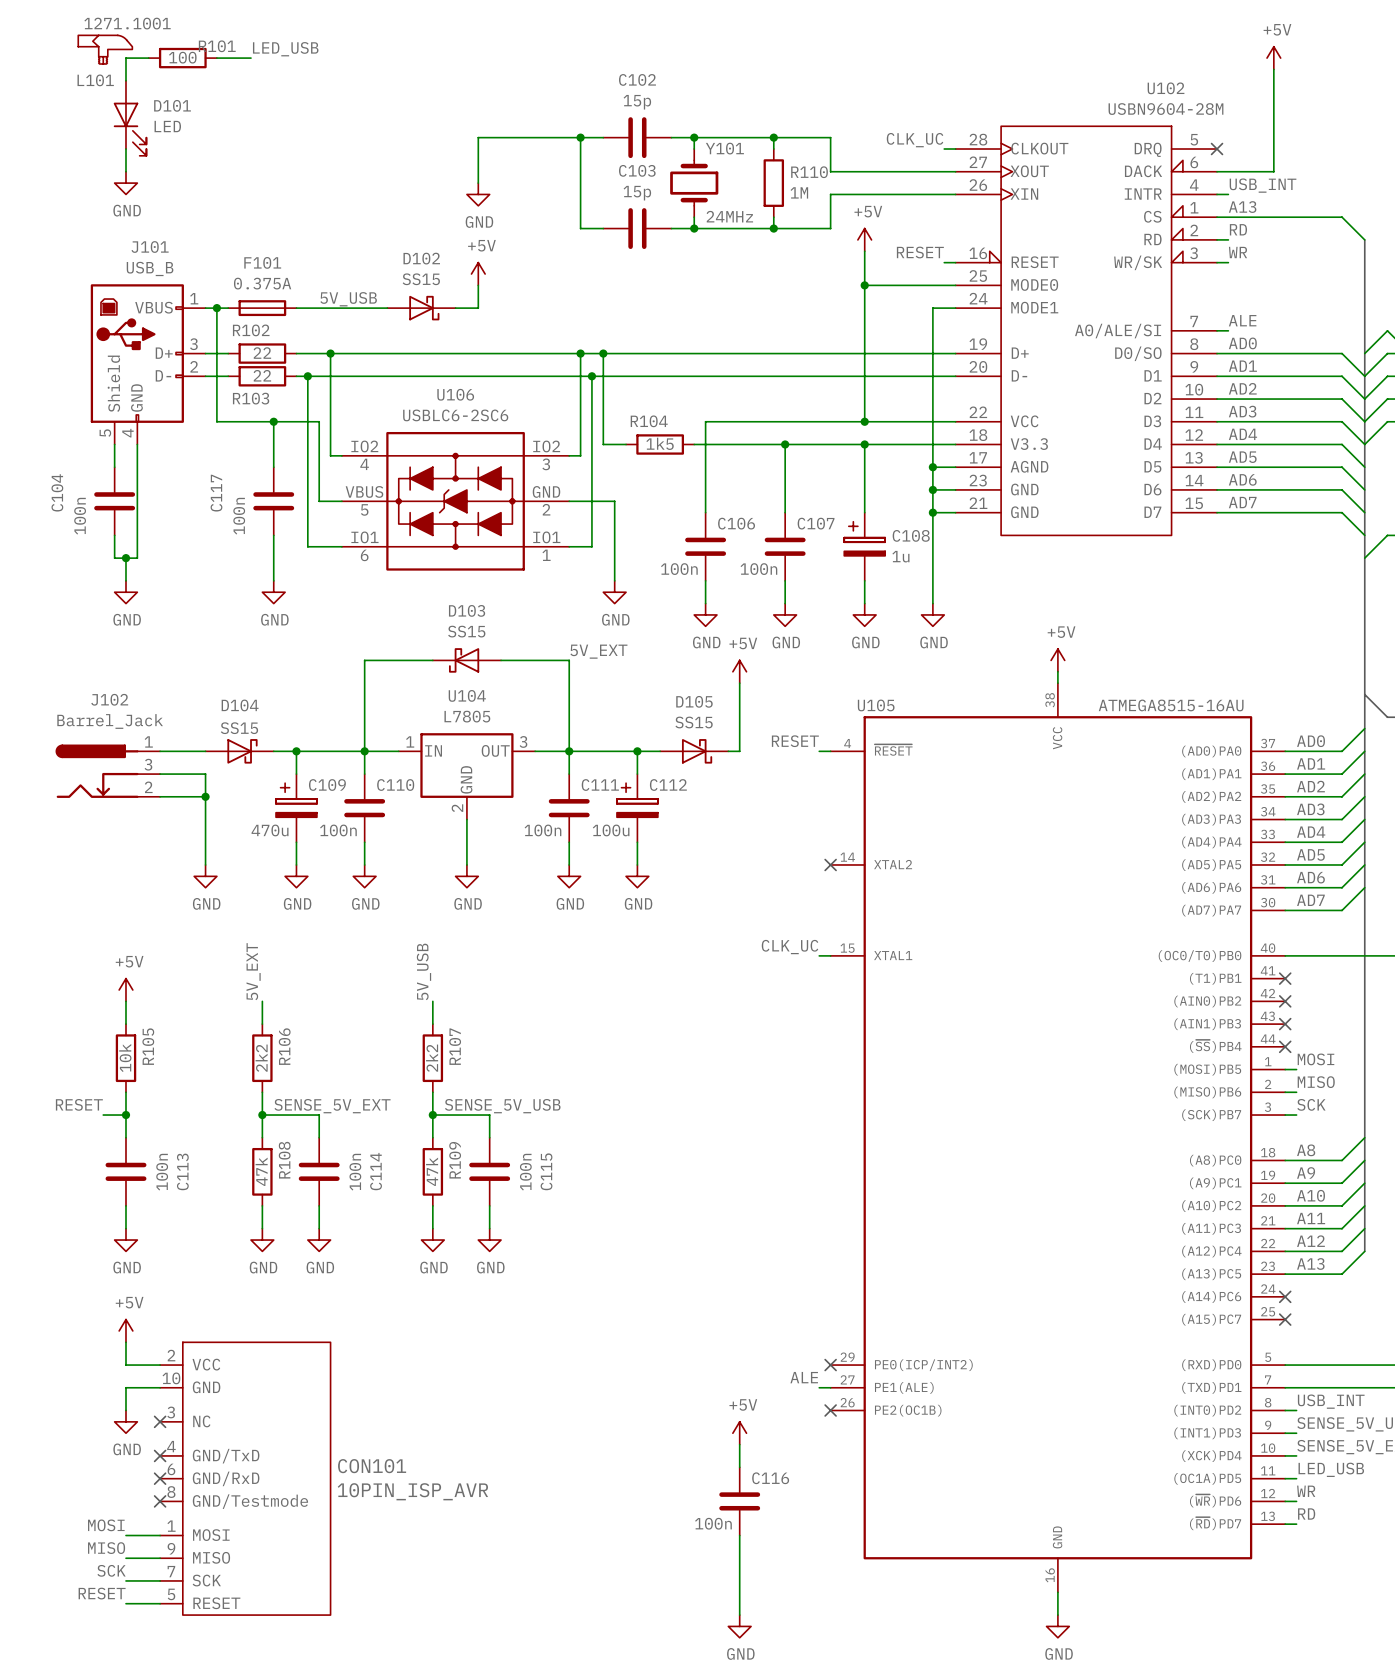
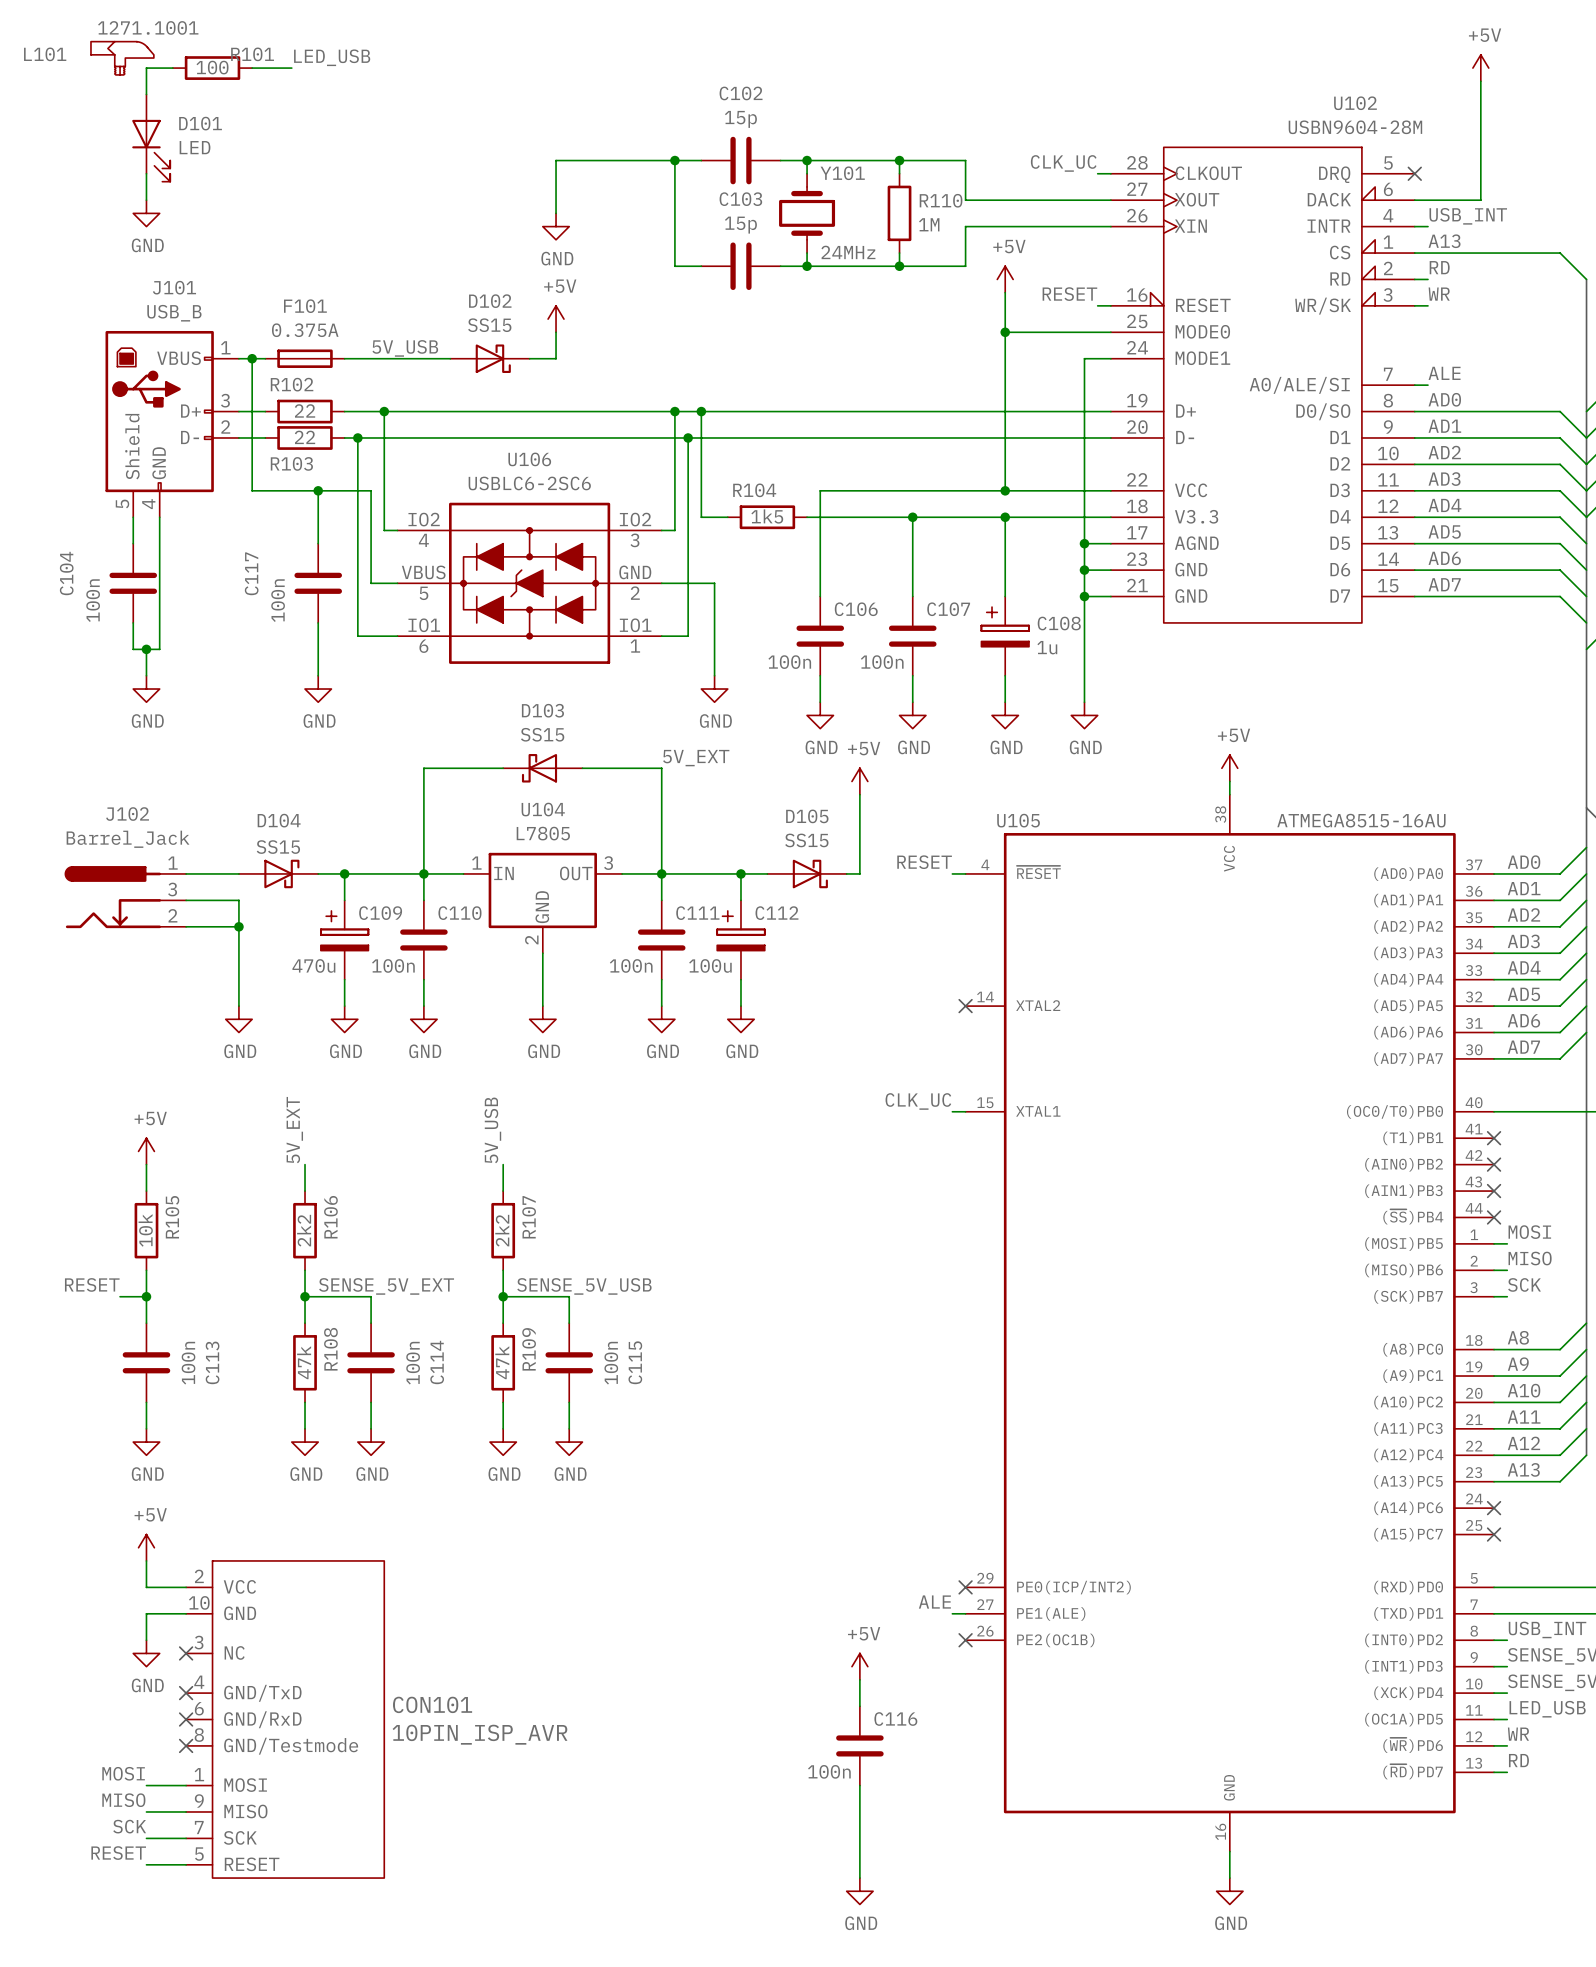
L101 name position: L101 (95, 80) -> L101 (45, 54)

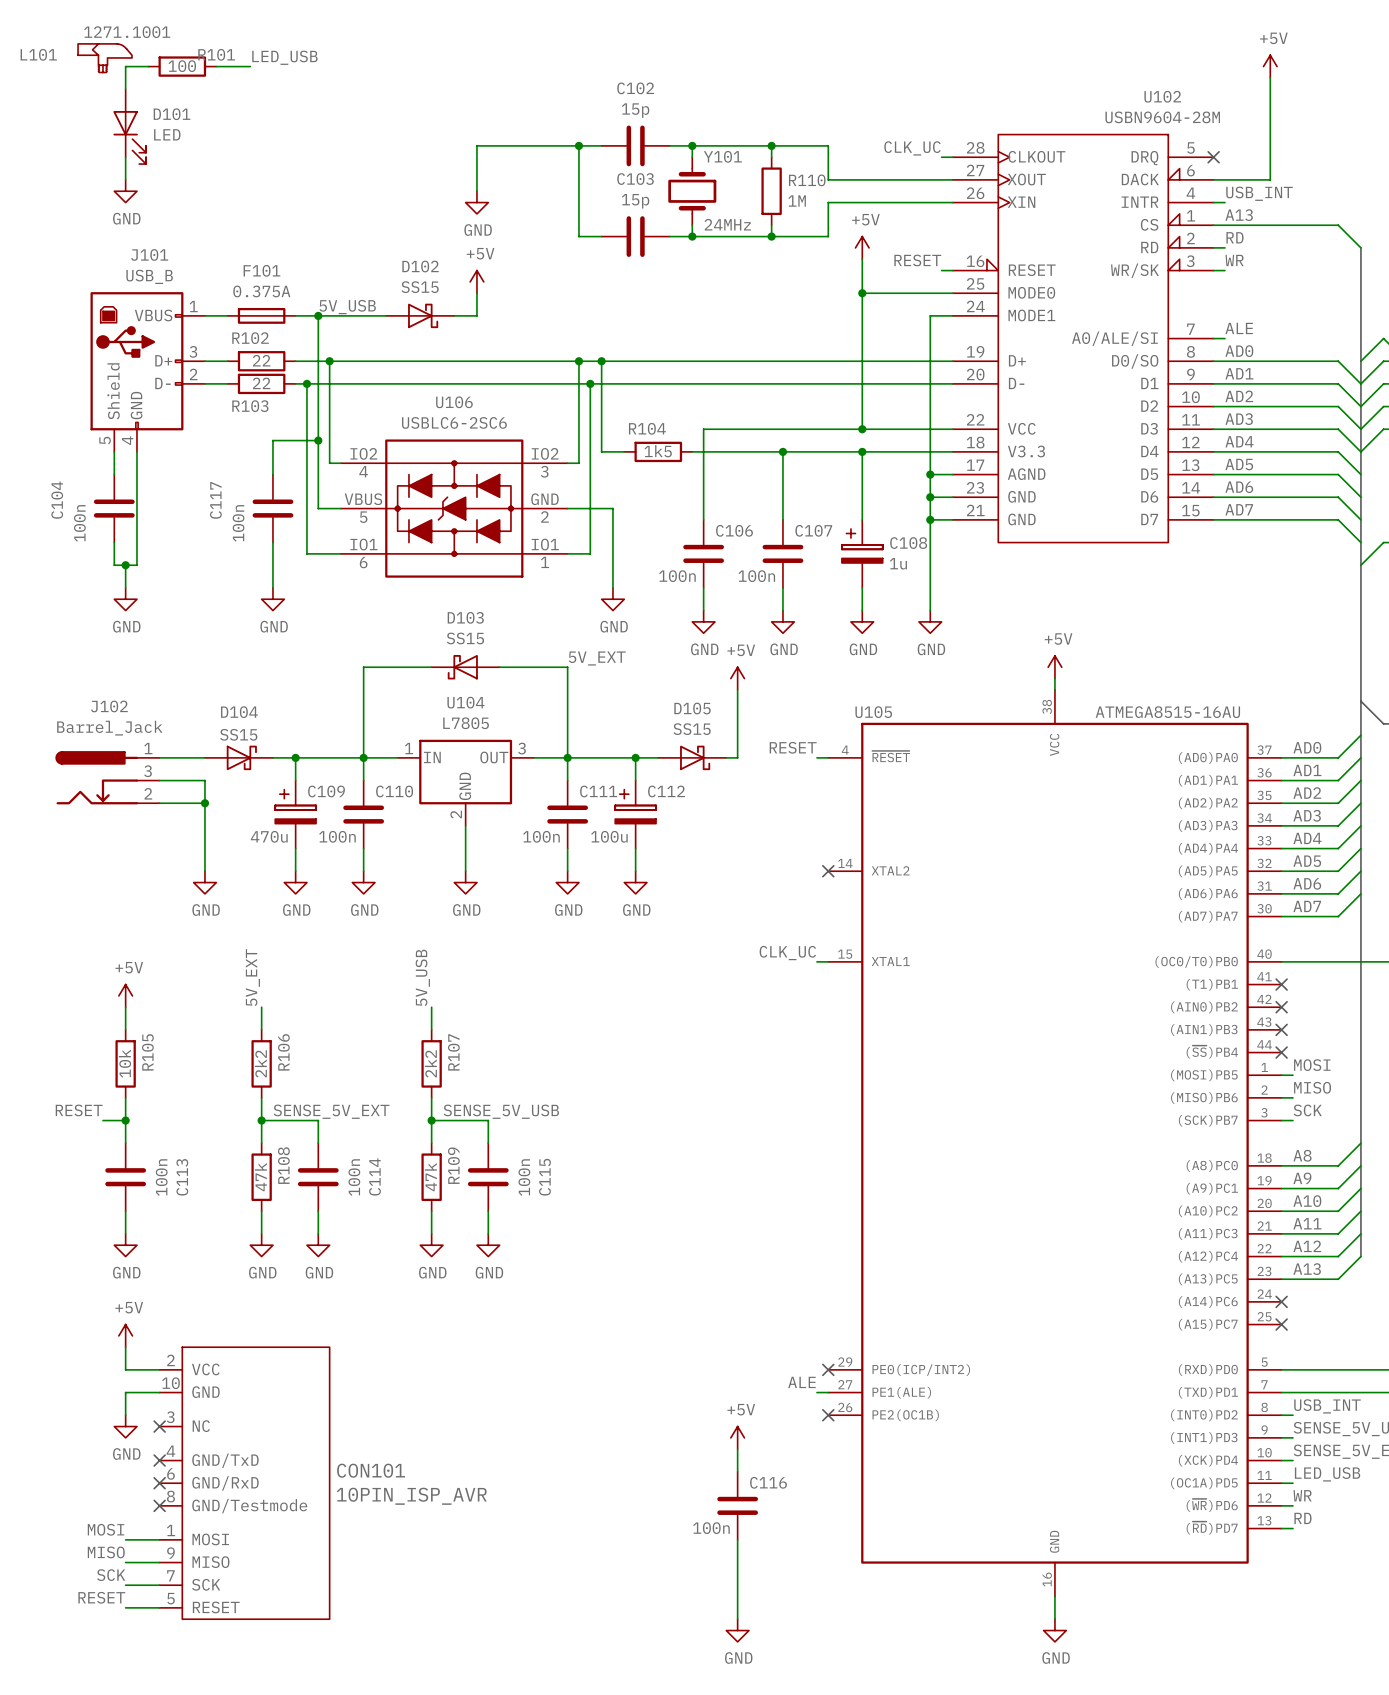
wire: (252, 358) (252, 490) (371, 490) -> (318, 315) (318, 429)
junction: (252, 358) -> none
junction: none -> (318, 315)
wire: (318, 490) (318, 504) -> (318, 440) (272, 440)
junction position: (318, 490) -> (318, 440)

